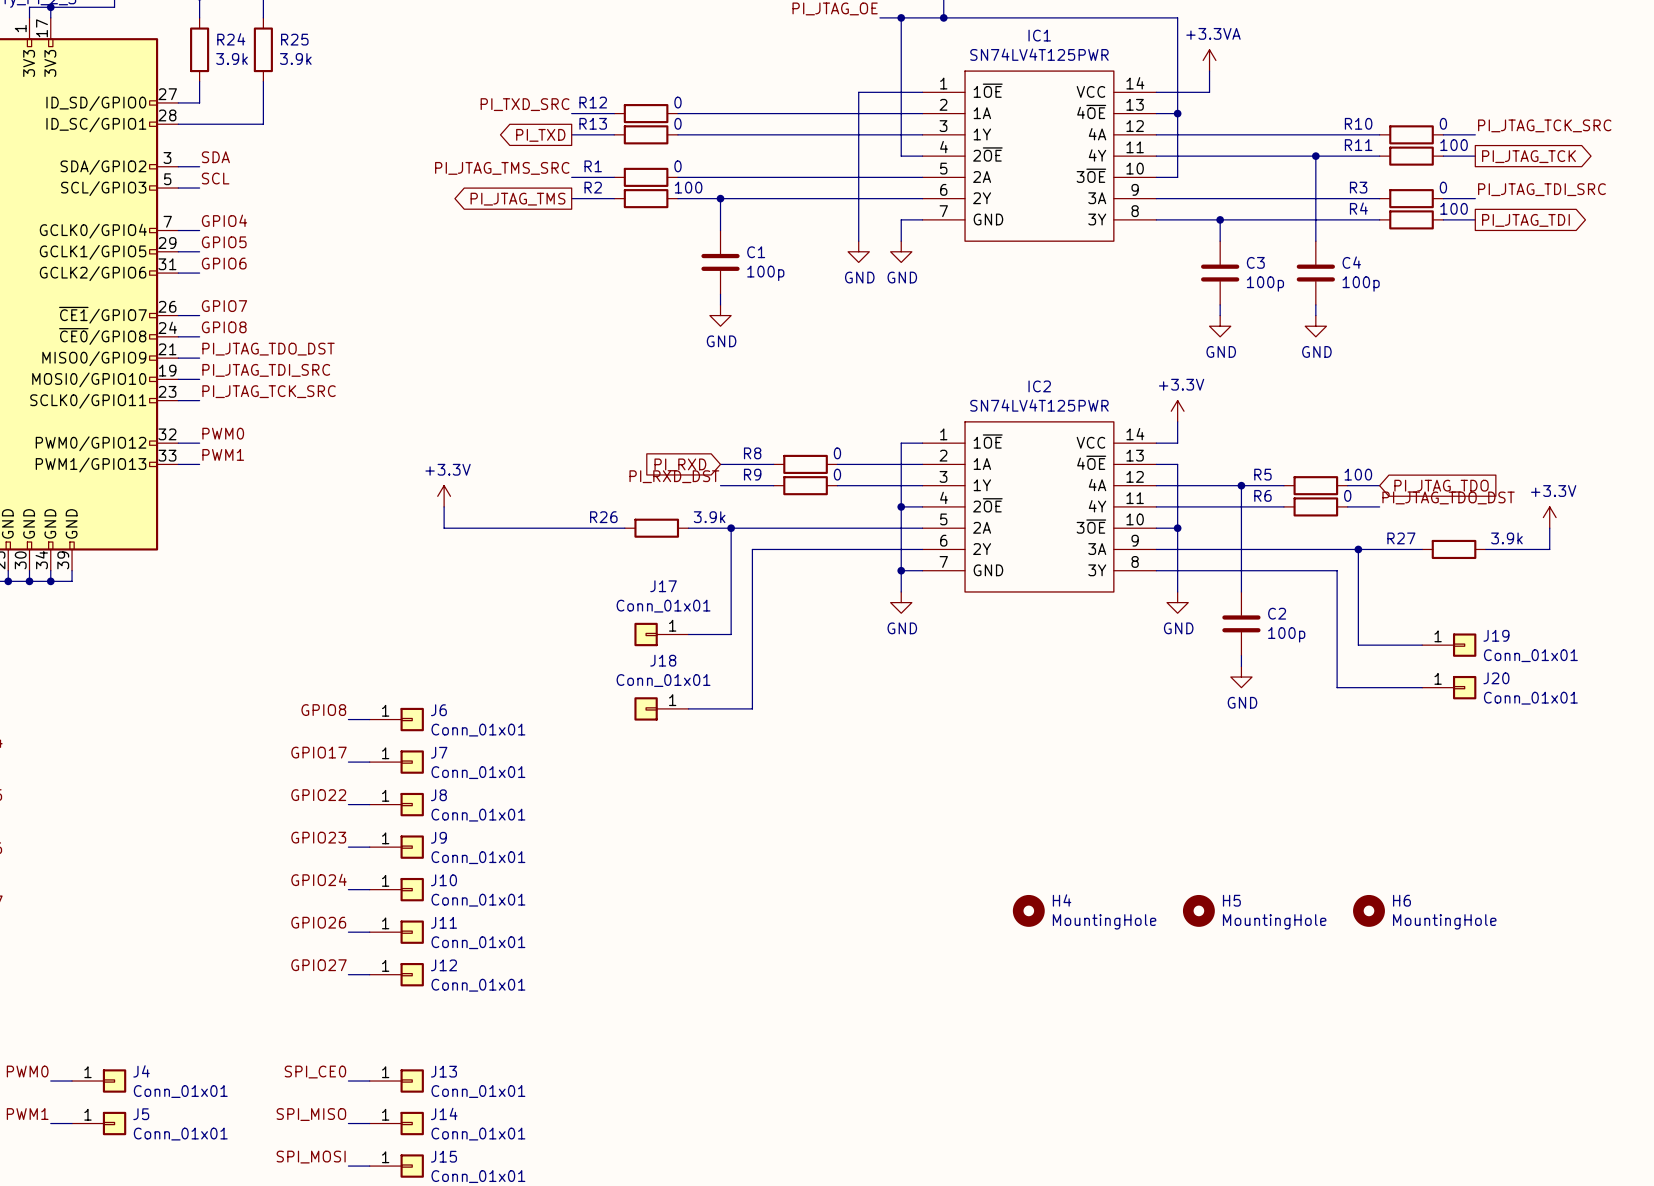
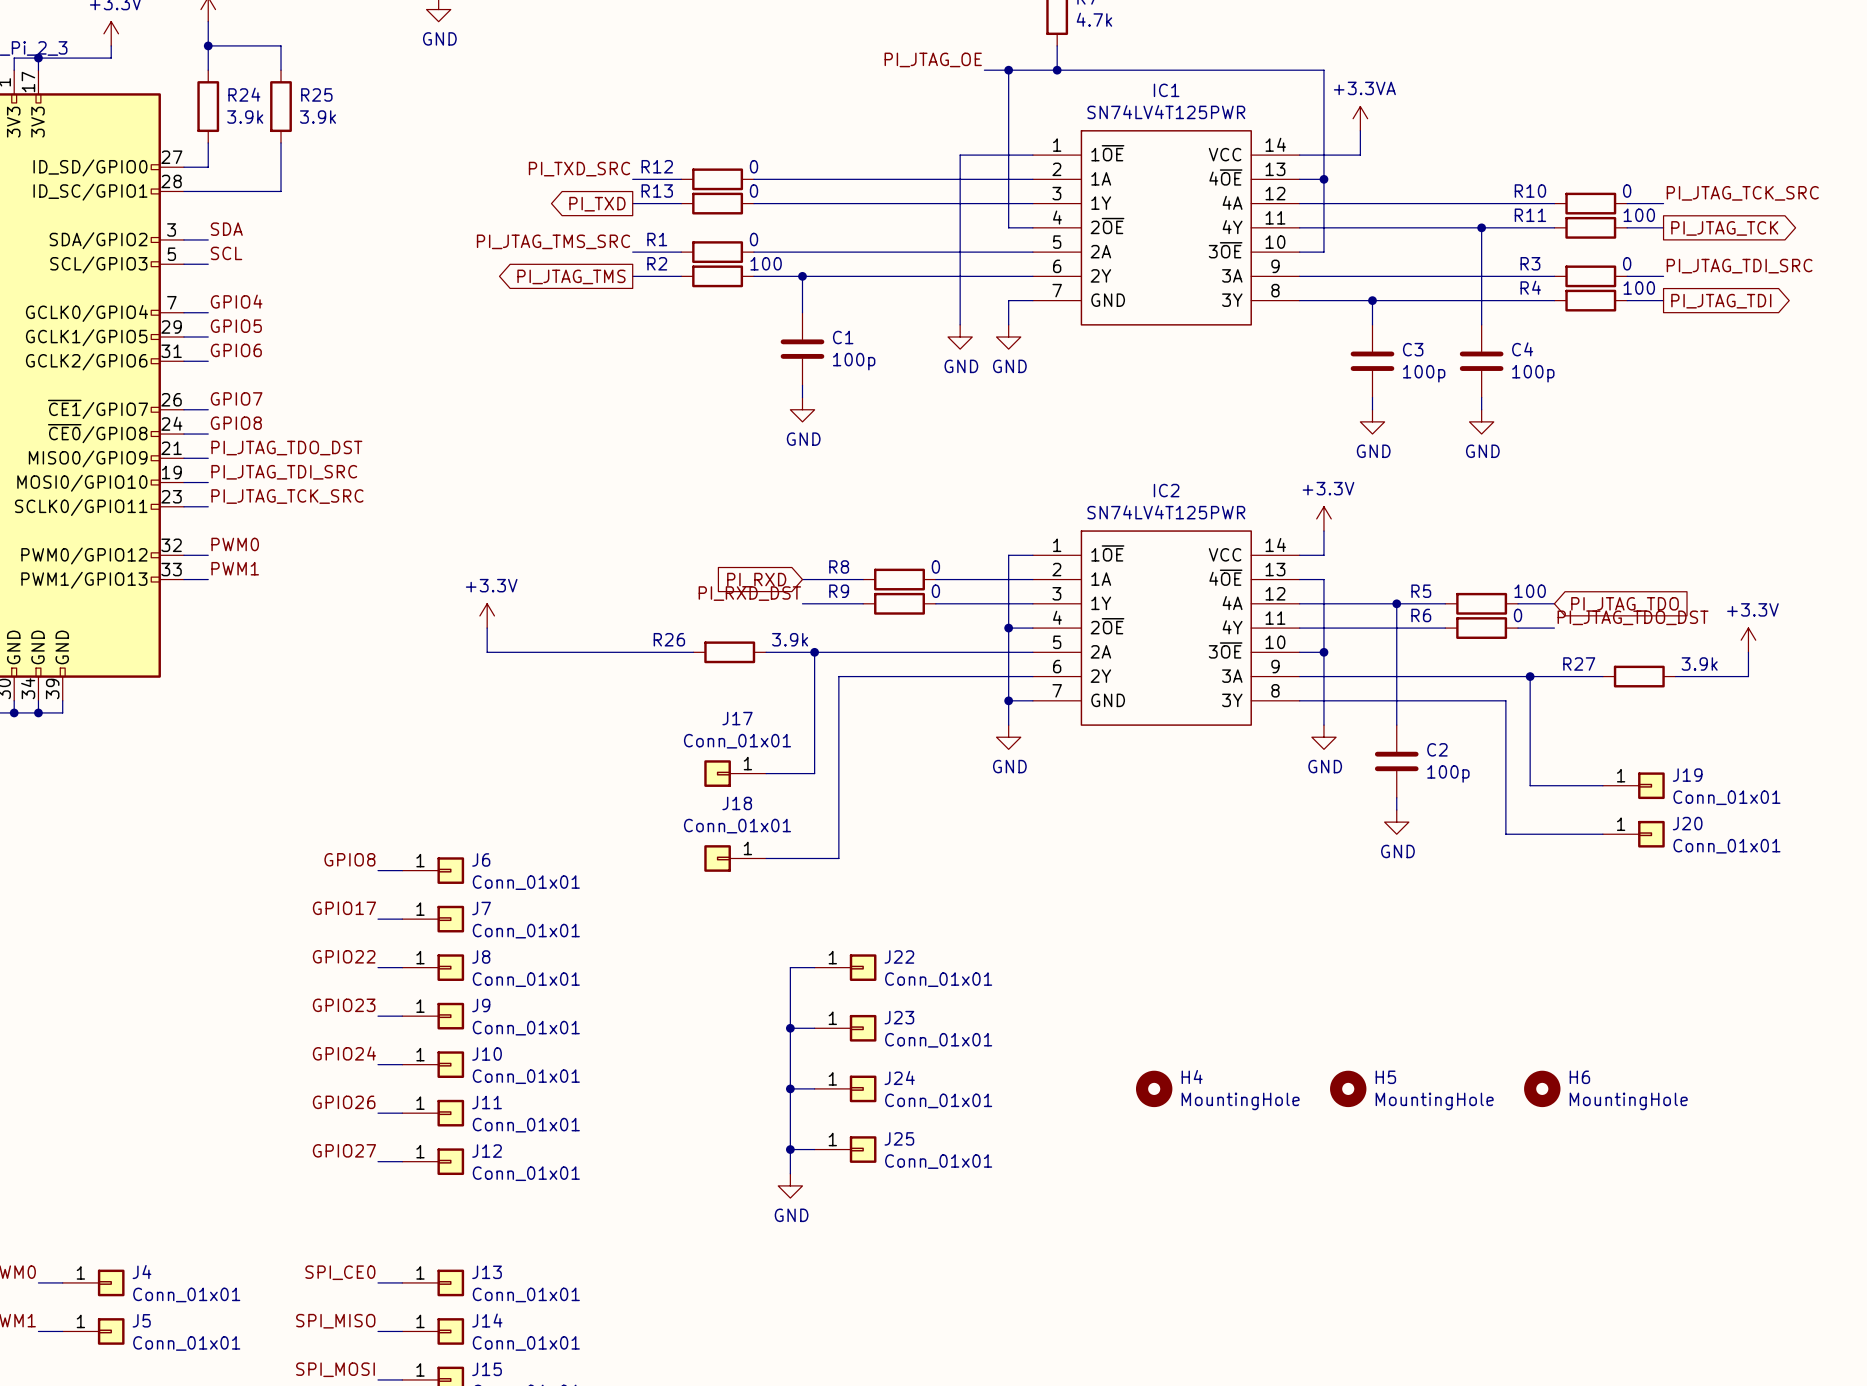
wire: none -> (814, 967) (790, 967) (790, 1173)
J22: none -> Conn_01x01 (845, 967)
wire: none -> (790, 1028) (814, 1028)
junction: none -> (790, 1028)
J23: none -> Conn_01x01 (845, 1028)
wire: none -> (790, 1088) (814, 1088)
junction: none -> (790, 1088)
J24: none -> Conn_01x01 (845, 1088)
wire: none -> (790, 1149) (814, 1149)
junction: none -> (790, 1149)
J25: none -> Conn_01x01 (845, 1149)
power symbol: none -> GND (790, 1185)

